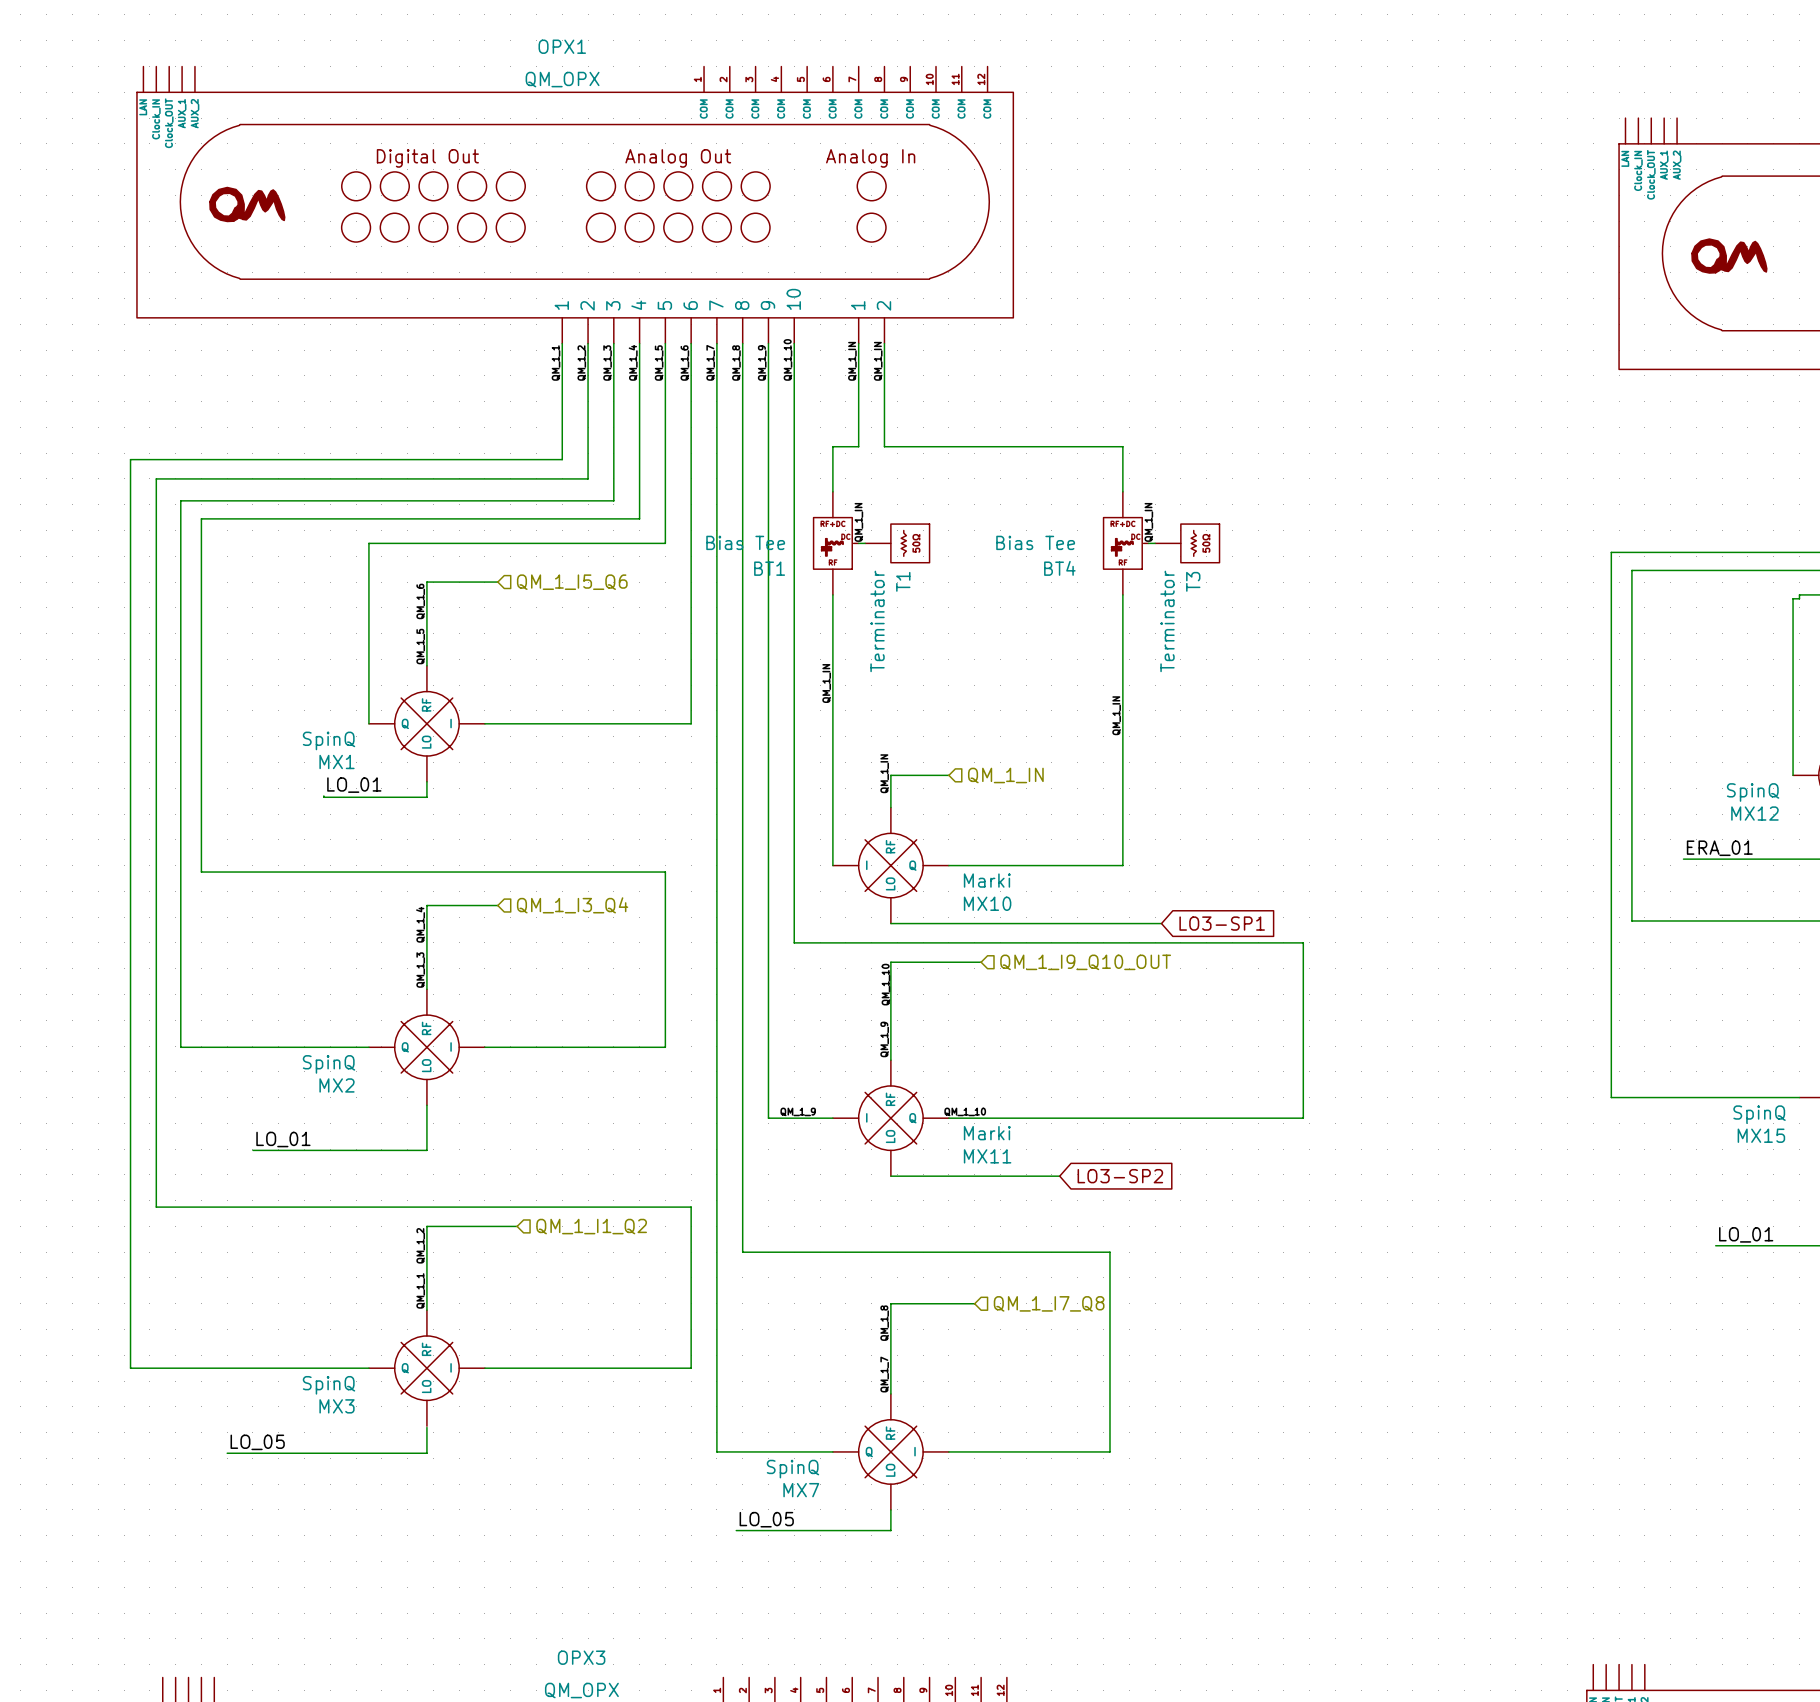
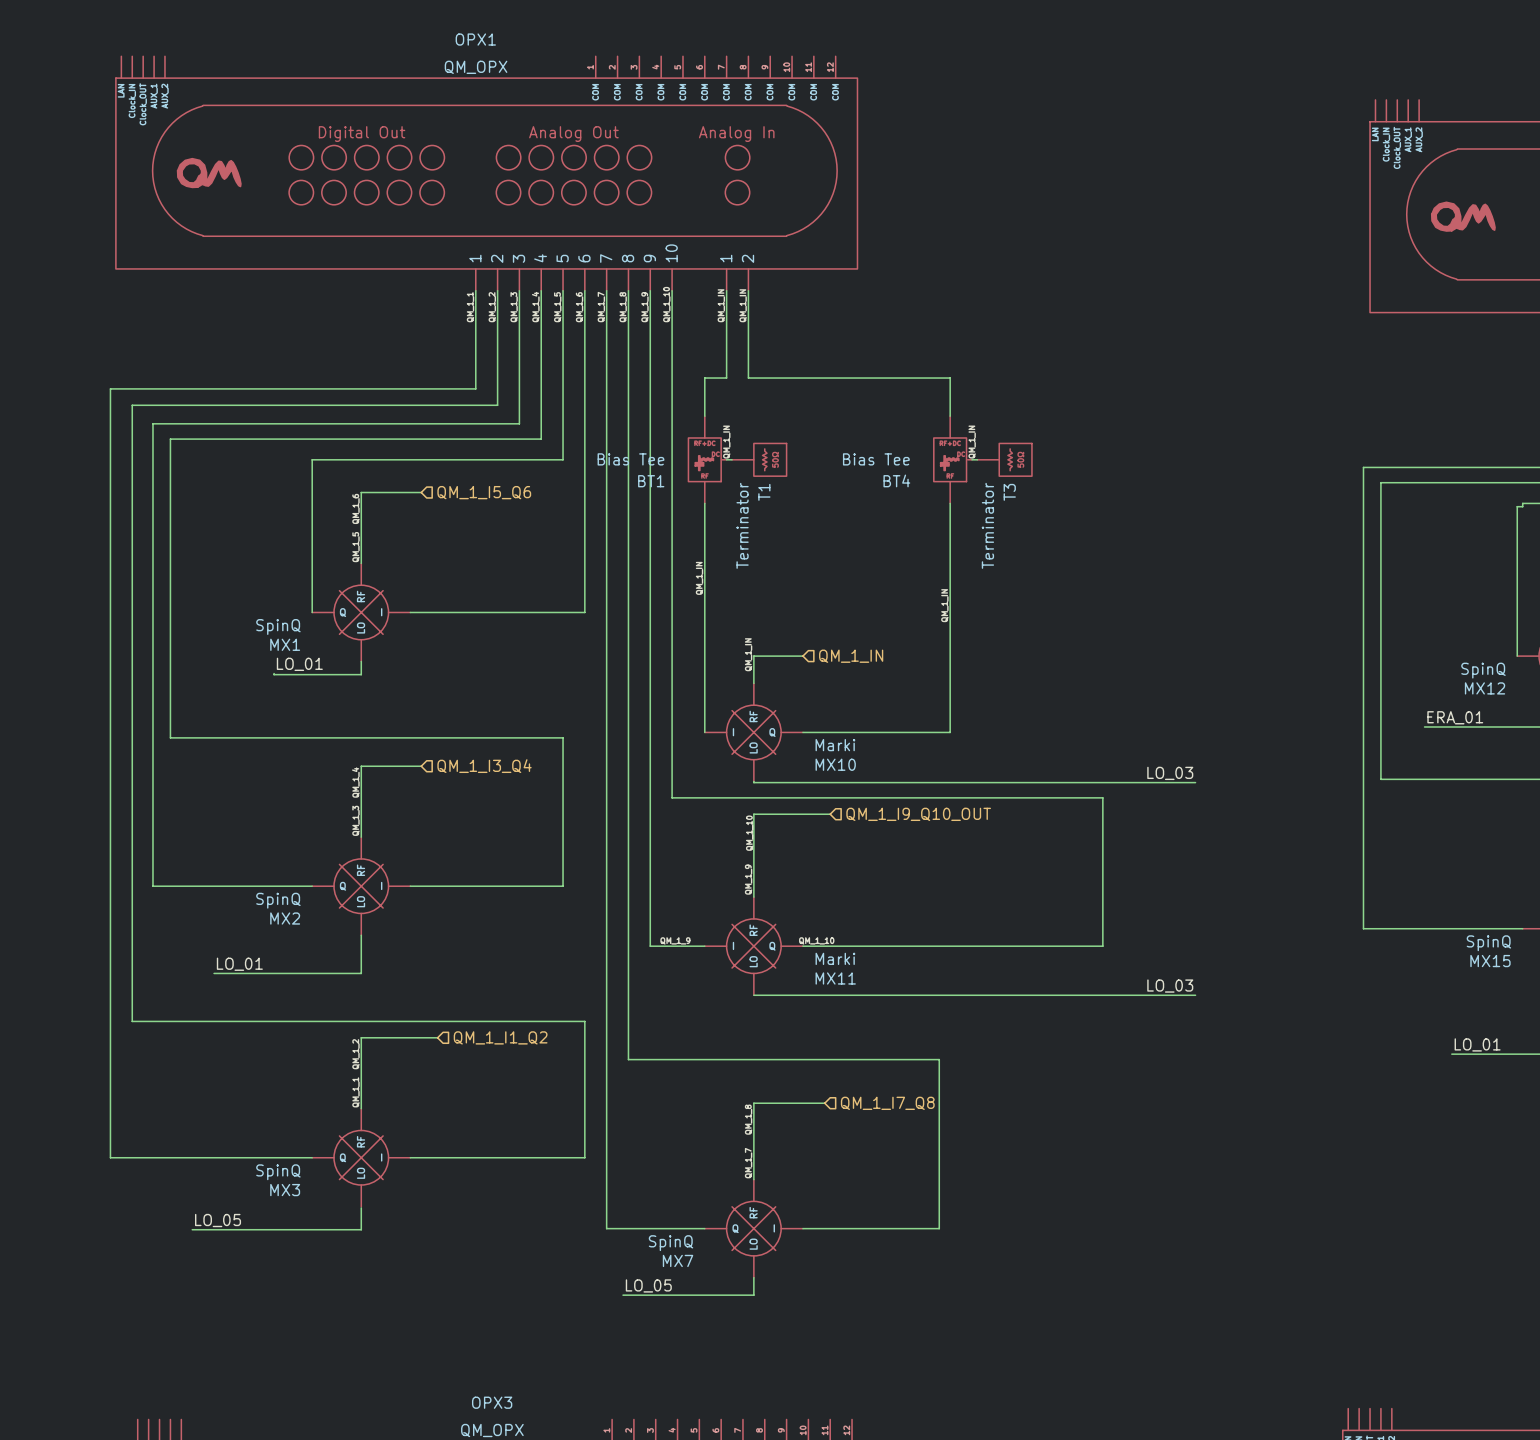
label: none -> LO_03 (1170, 773)
wire: (890, 923) (1161, 923) -> (753, 781) (1195, 782)
global label: LO3-SP1 (1222, 923) -> none
label: none -> LO_03 (1170, 986)
wire: none -> (896, 995) (1195, 995)
global label: LO3-SP2 (1120, 1176) -> none

